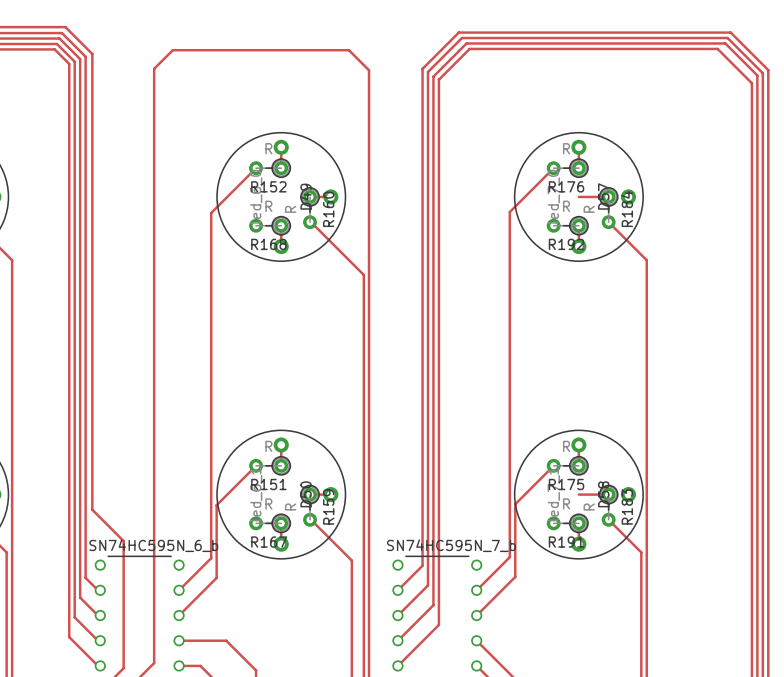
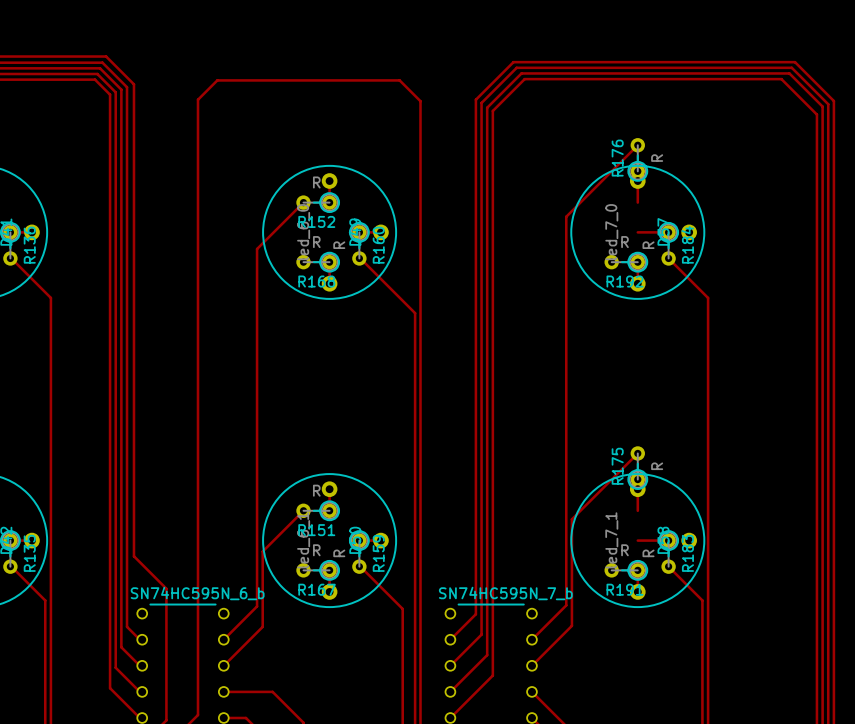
track: (553, 168) (509, 212) -> (637, 145) (566, 216) (566, 248)
R176 rotation: 0° (567, 168) -> 90° clockwise (637, 159)
R176 position: (567, 168) -> (637, 159)
track: (553, 465) (515, 504) -> (637, 453) (571, 519) (571, 550)
R175 rotation: 0° (567, 465) -> 90° clockwise (637, 467)
R175 position: (567, 465) -> (637, 467)

